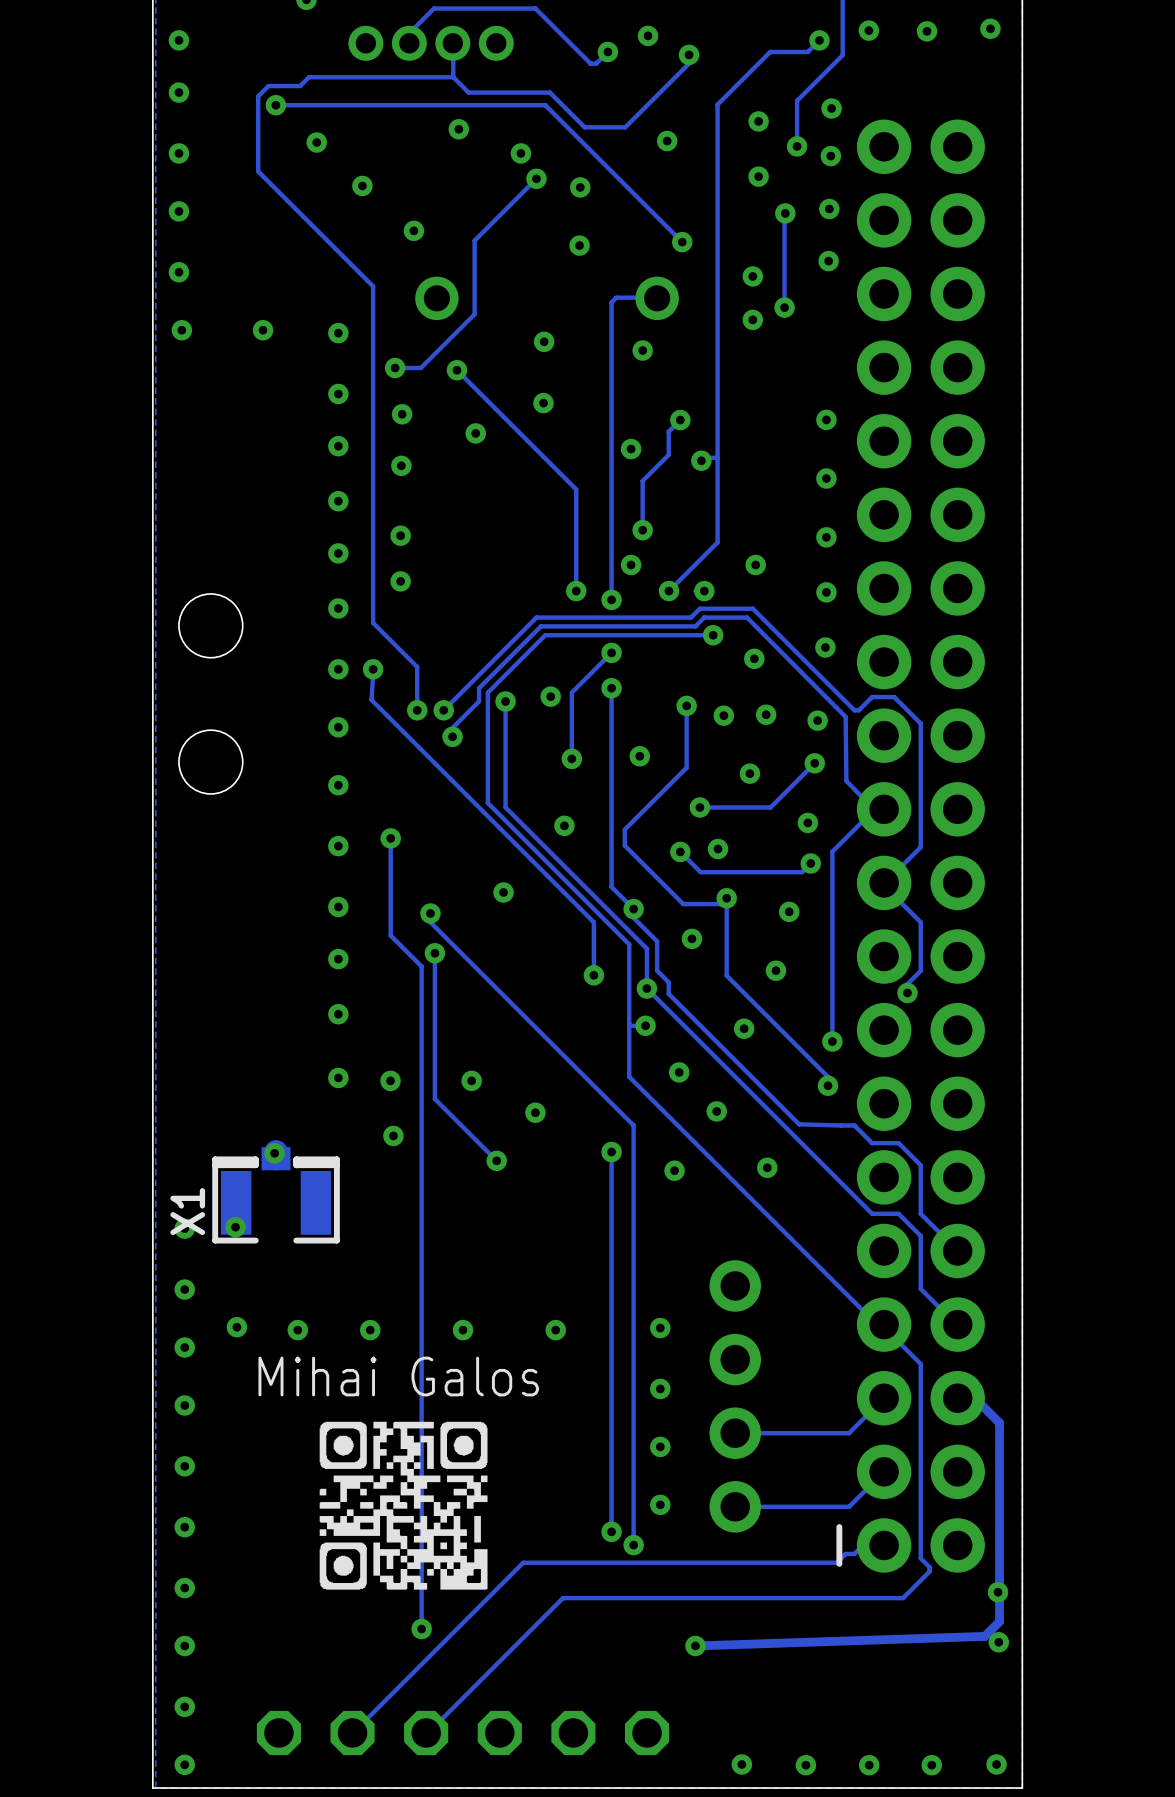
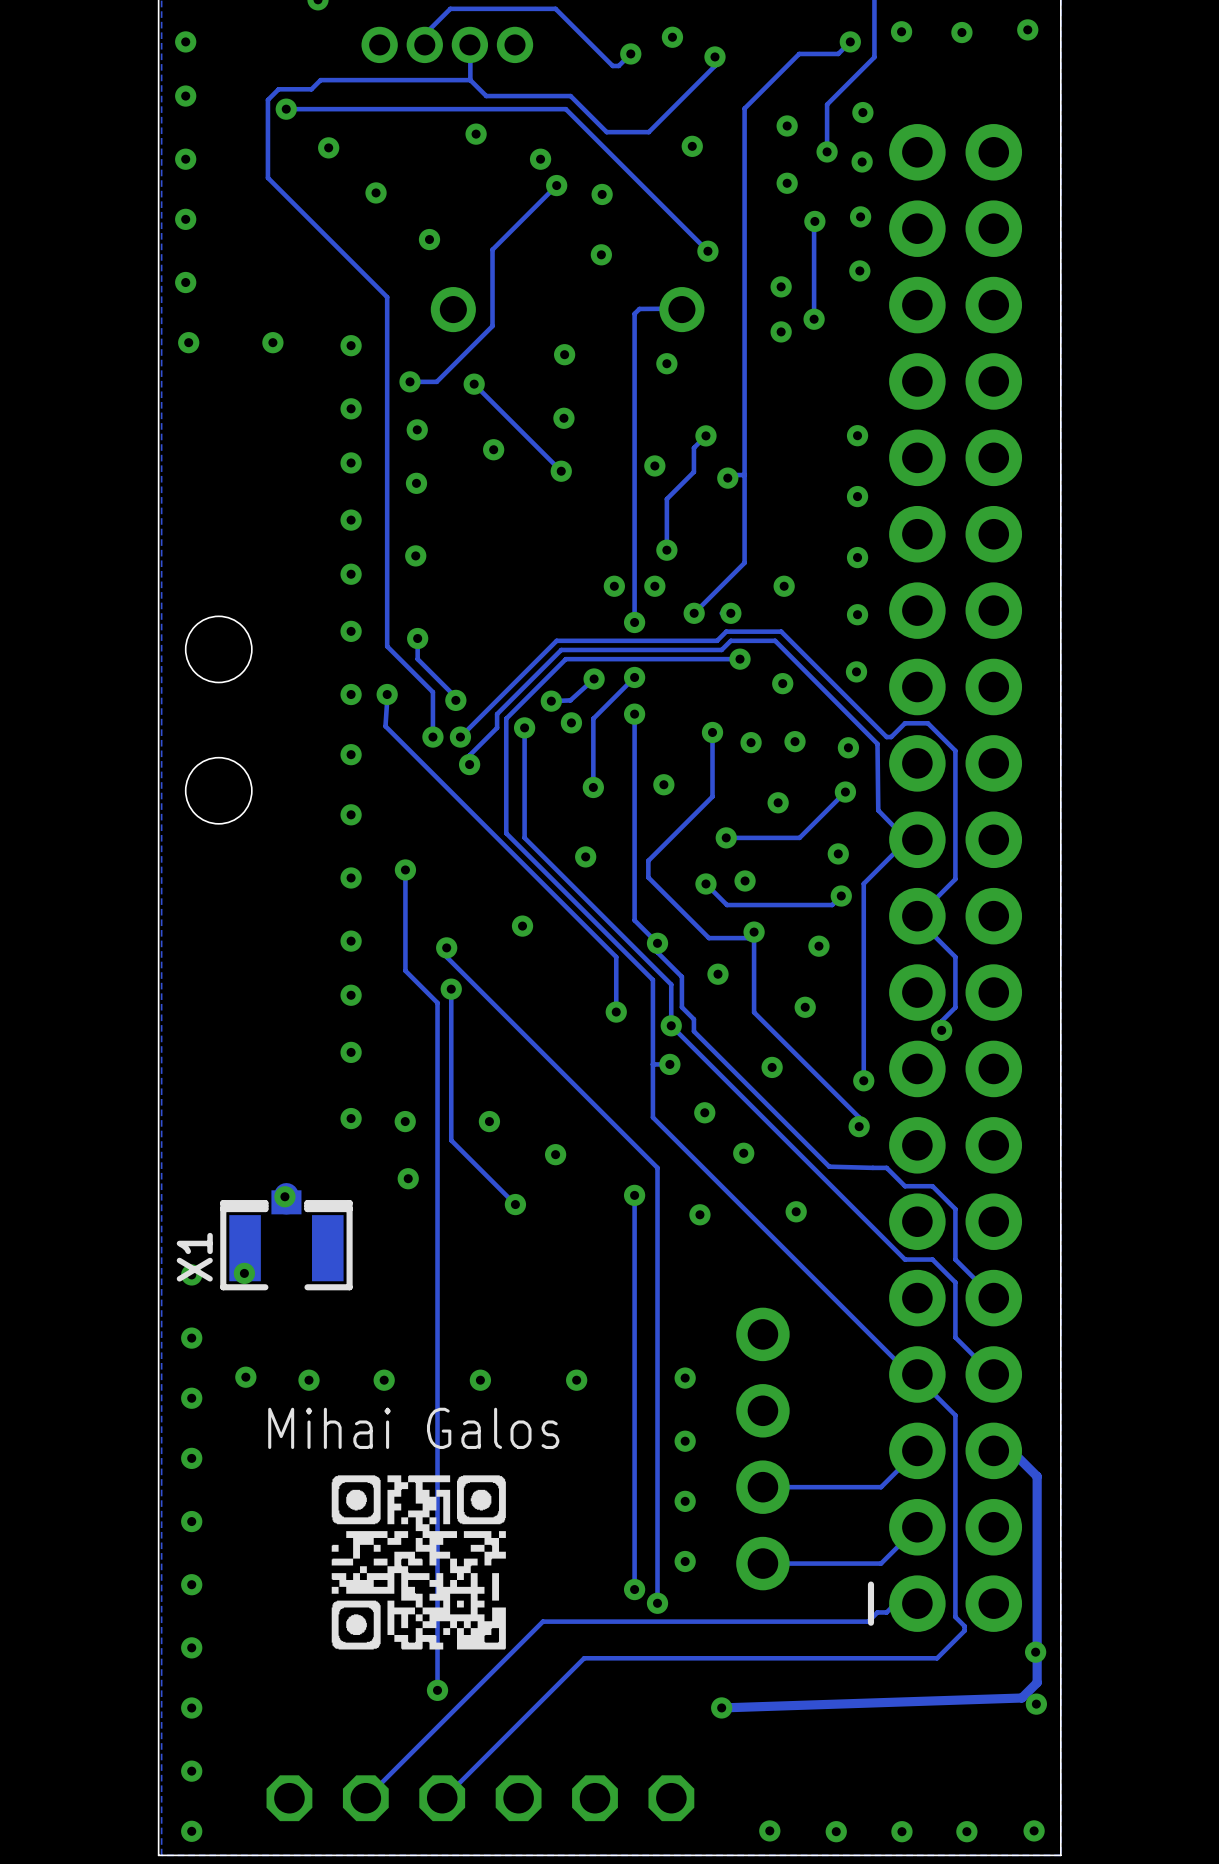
track: (540, 454) (576, 489) (576, 591) -> none
via: none -> (561, 471)
via position: (400, 581) -> (417, 638)
via position: (576, 591) -> (614, 586)
track: none -> (417, 638) (417, 659) (457, 698) (455, 700)
track: none -> (594, 679) (570, 700) (551, 701)
via: none -> (594, 679)
via: none -> (455, 700)
via: none -> (551, 701)

